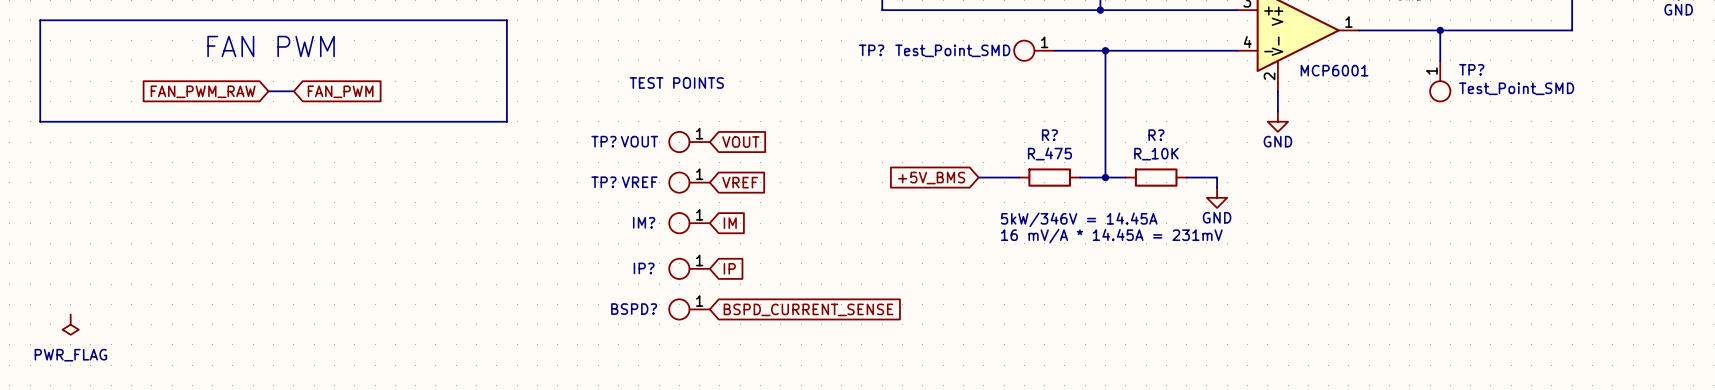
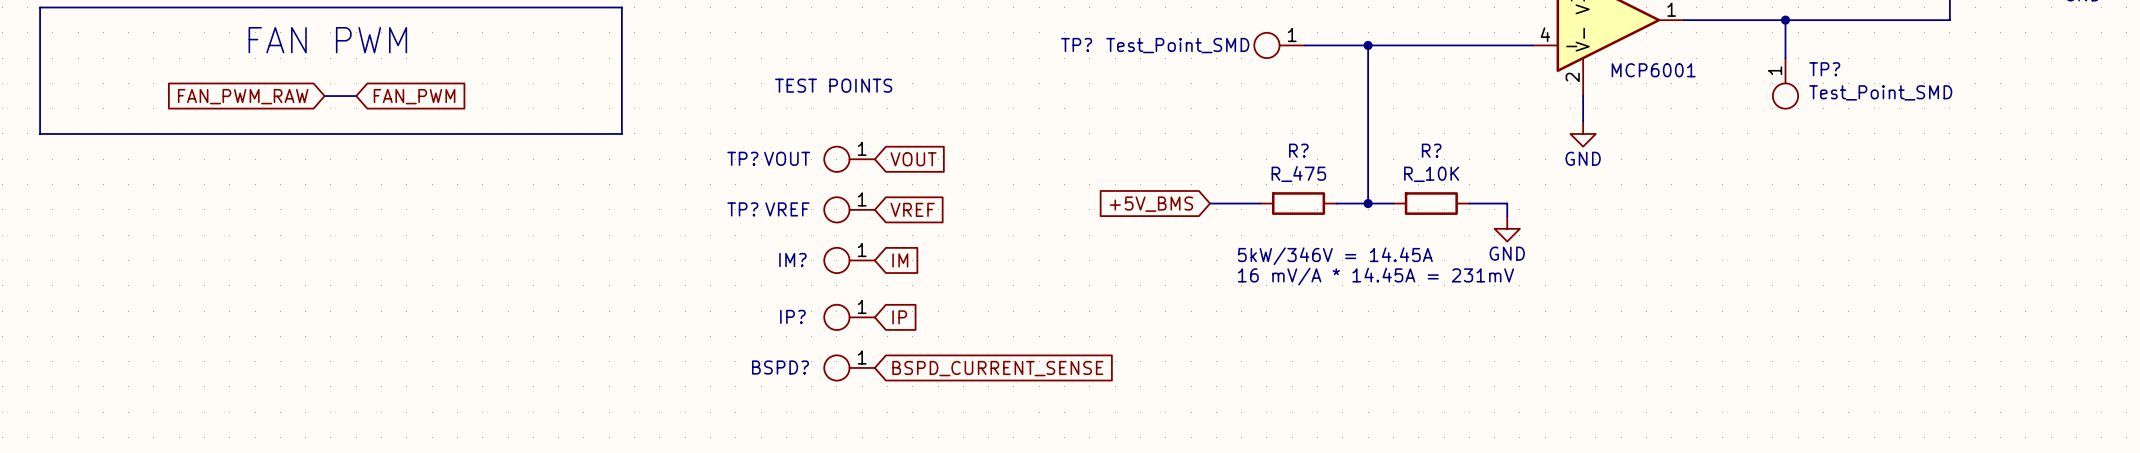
power symbol: PWR_FLAG (70, 324) -> none

